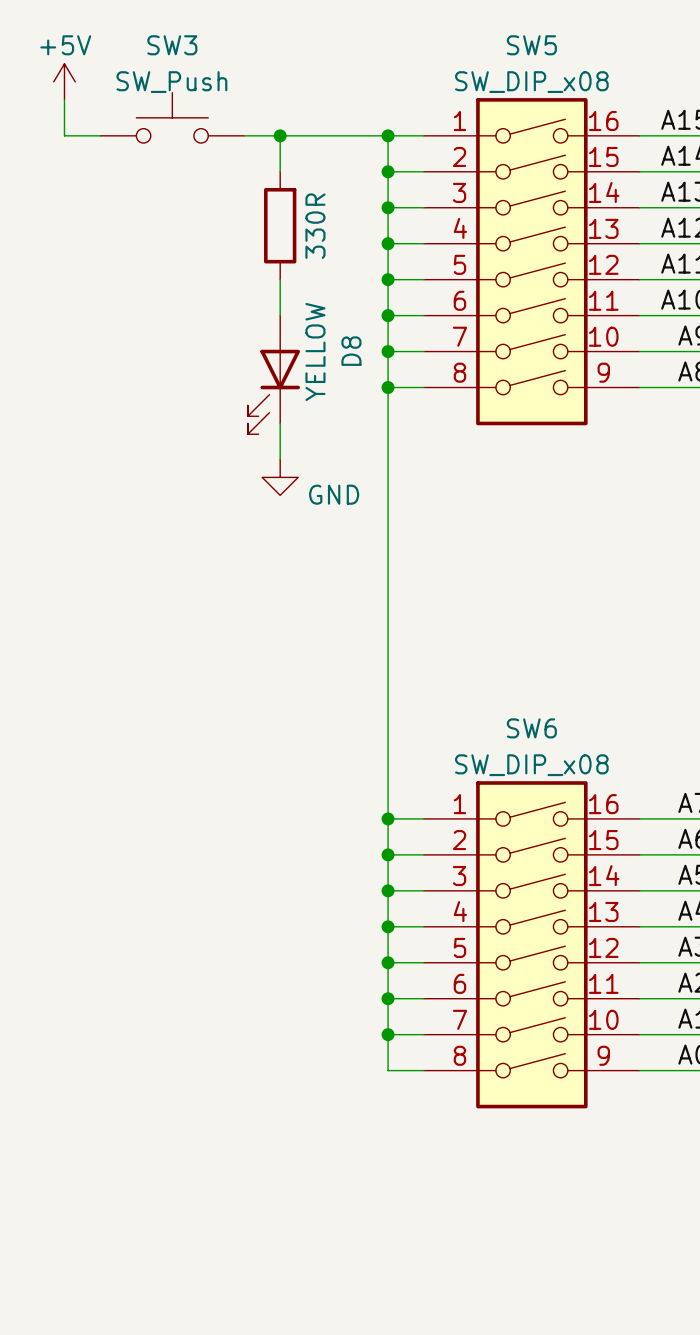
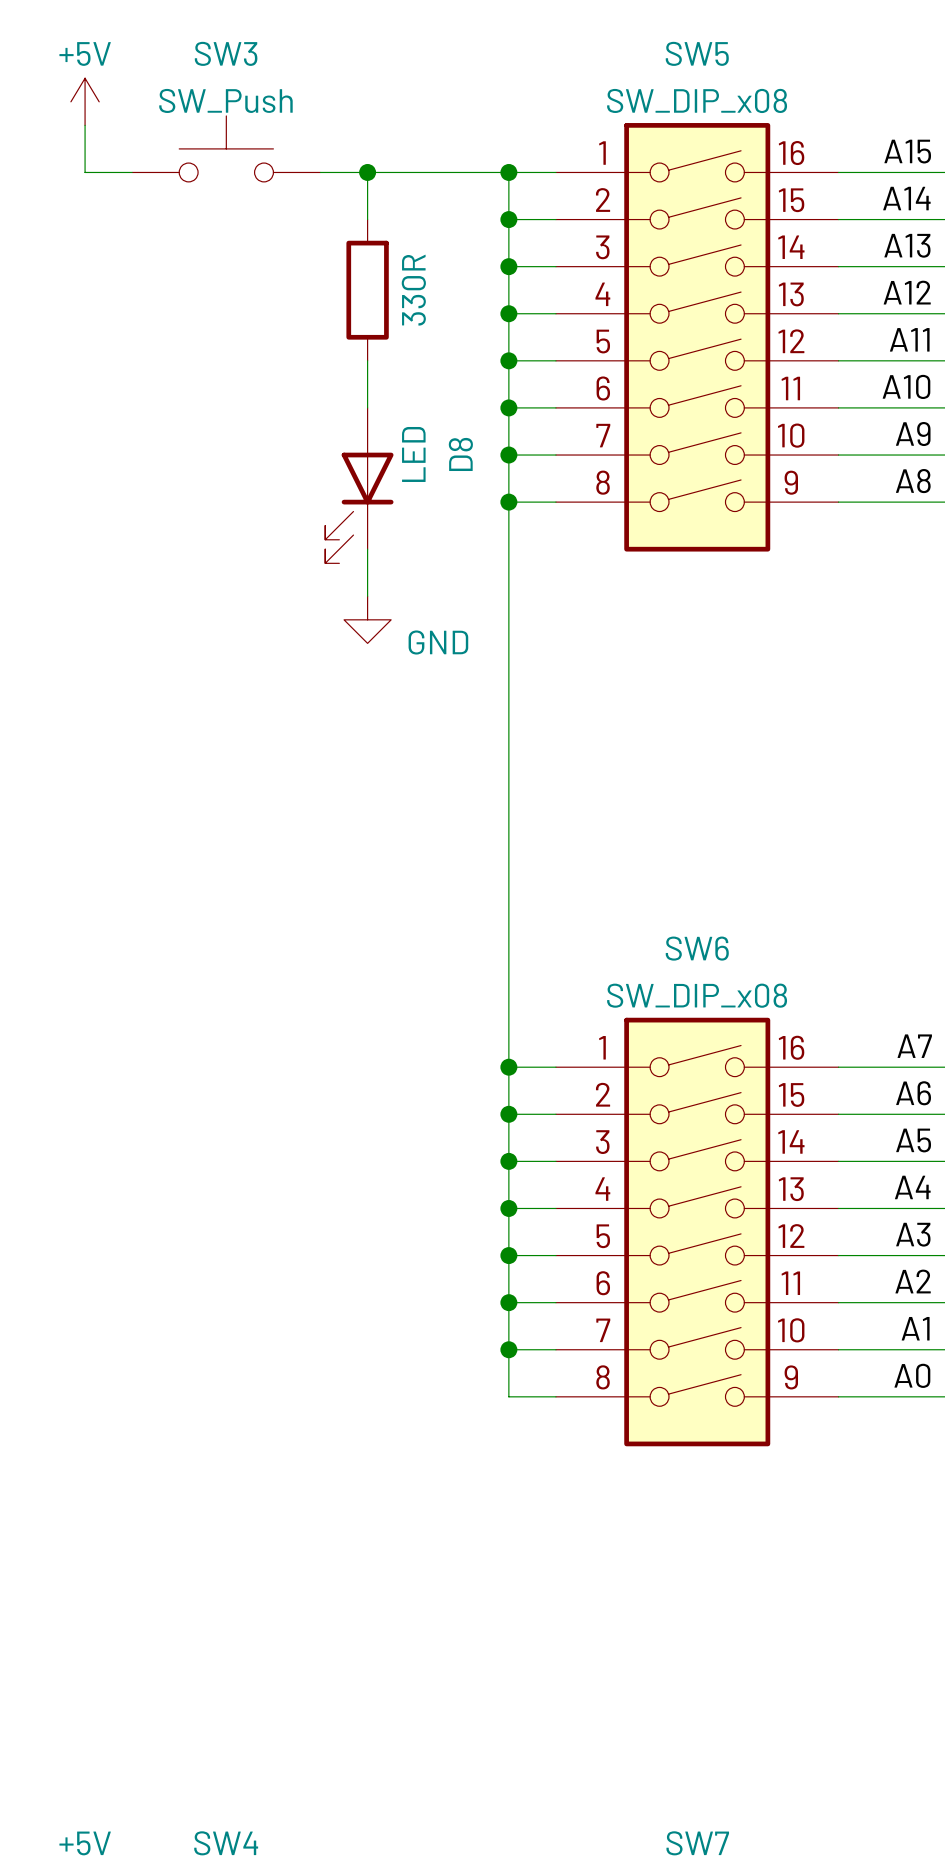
D8 value: YELLOW (315, 351) -> LED (413, 454)

